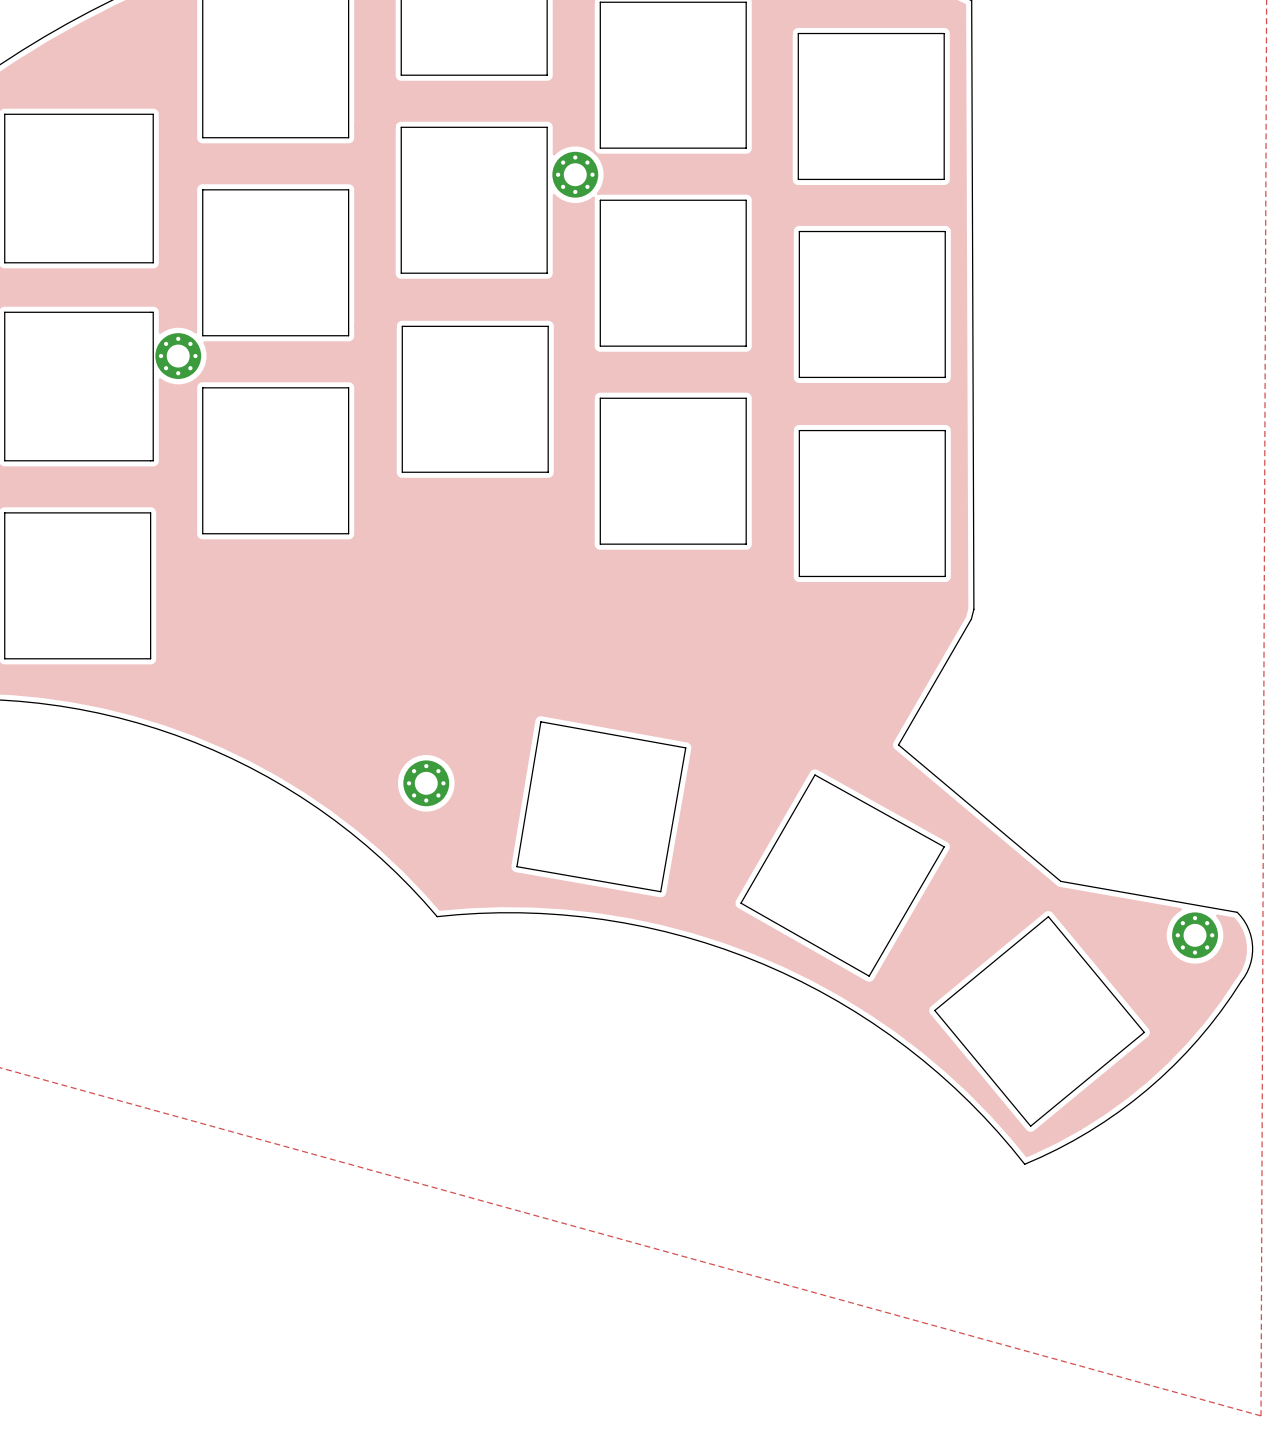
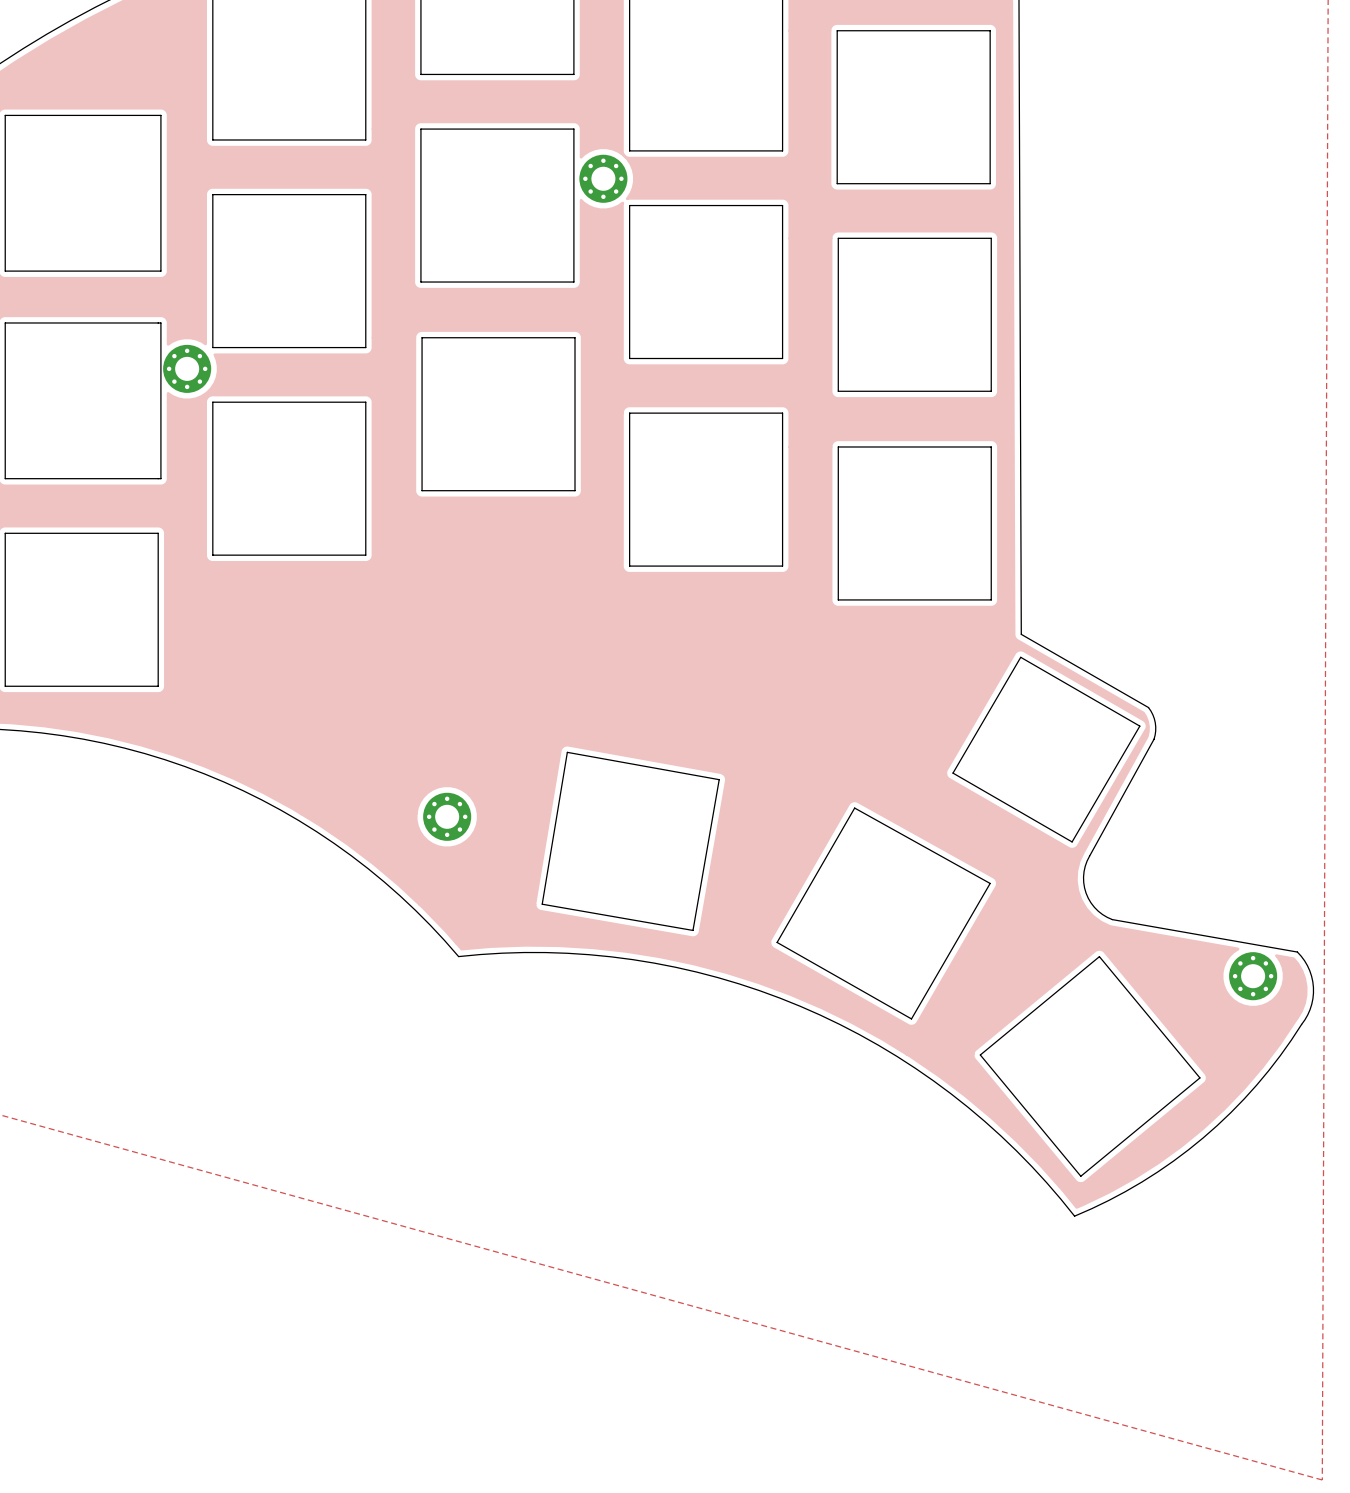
board edge: (973, 609) (971, 619) (898, 744) (1060, 881) -> (1021, 634) (1148, 707) (1154, 718) (1155, 731) (1154, 739) (1089, 856) (1084, 871) (1084, 887) (1091, 902) (1102, 914) (1112, 919)
board edge: none -> (1020, 657) (953, 773) (1072, 841) (1139, 726) (1020, 657)

